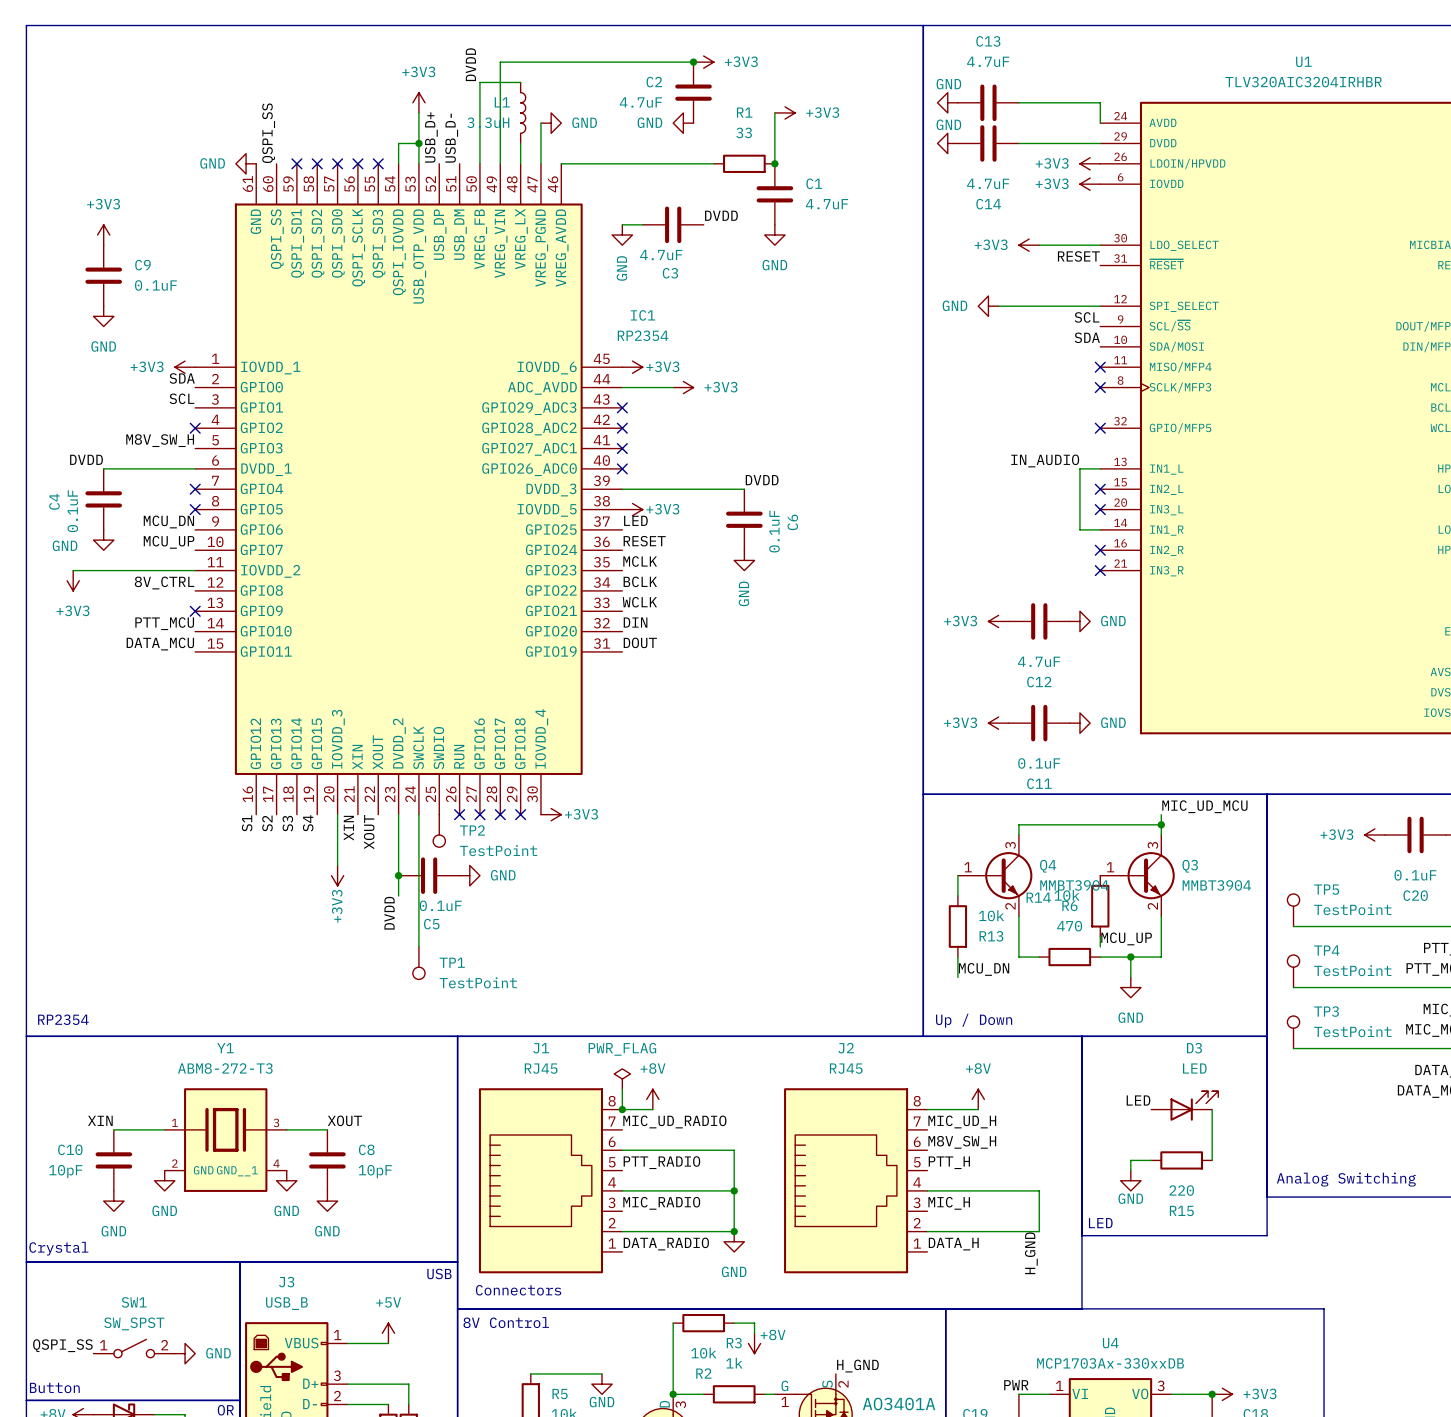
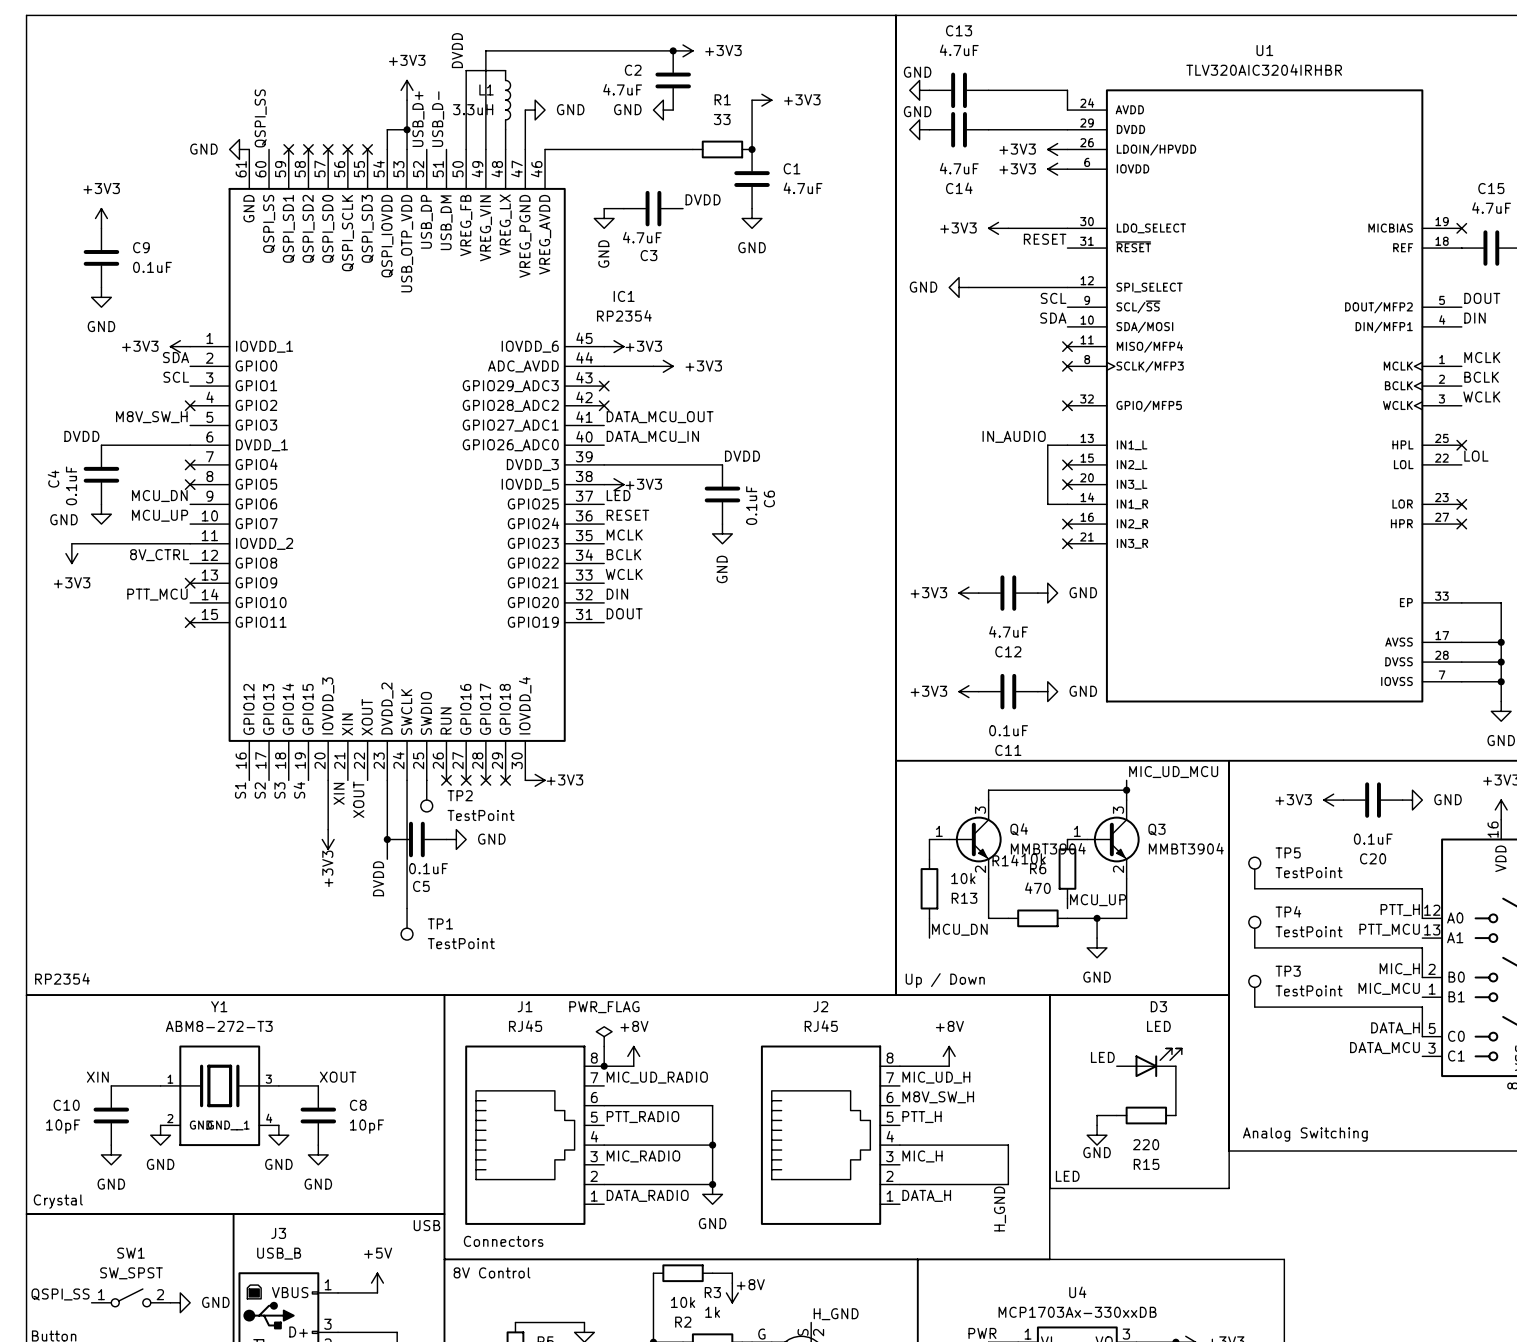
label: none -> DATA_MCU_OUT (660, 417)
no-connect mark: (622, 448) -> none
label: none -> DATA_MCU_IN (652, 436)
no-connect mark: (622, 468) -> none
label: DATA_MCU (160, 644) -> none
no-connect mark: none -> (190, 622)

